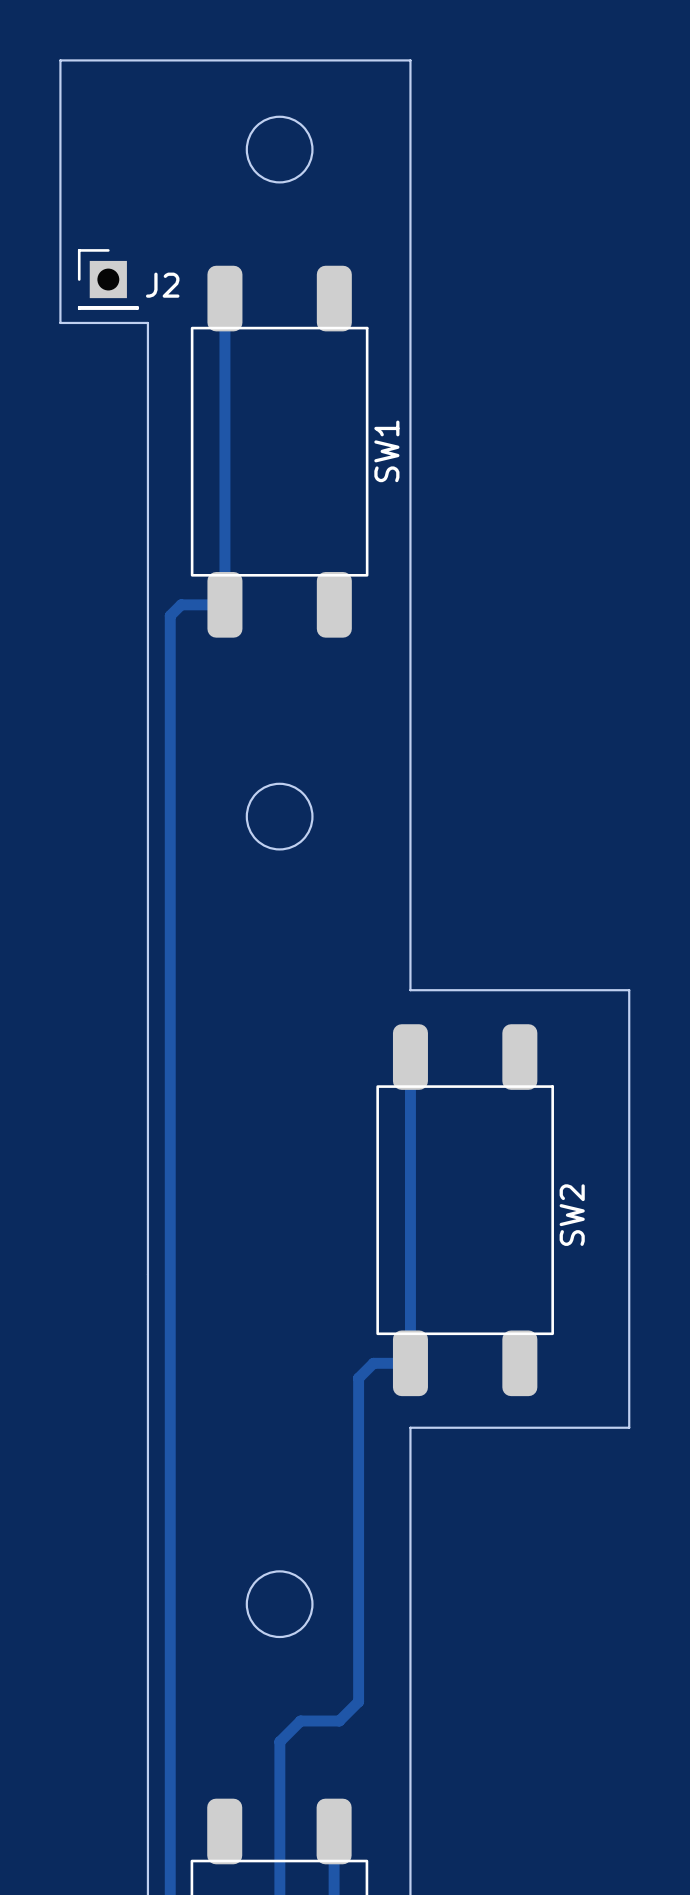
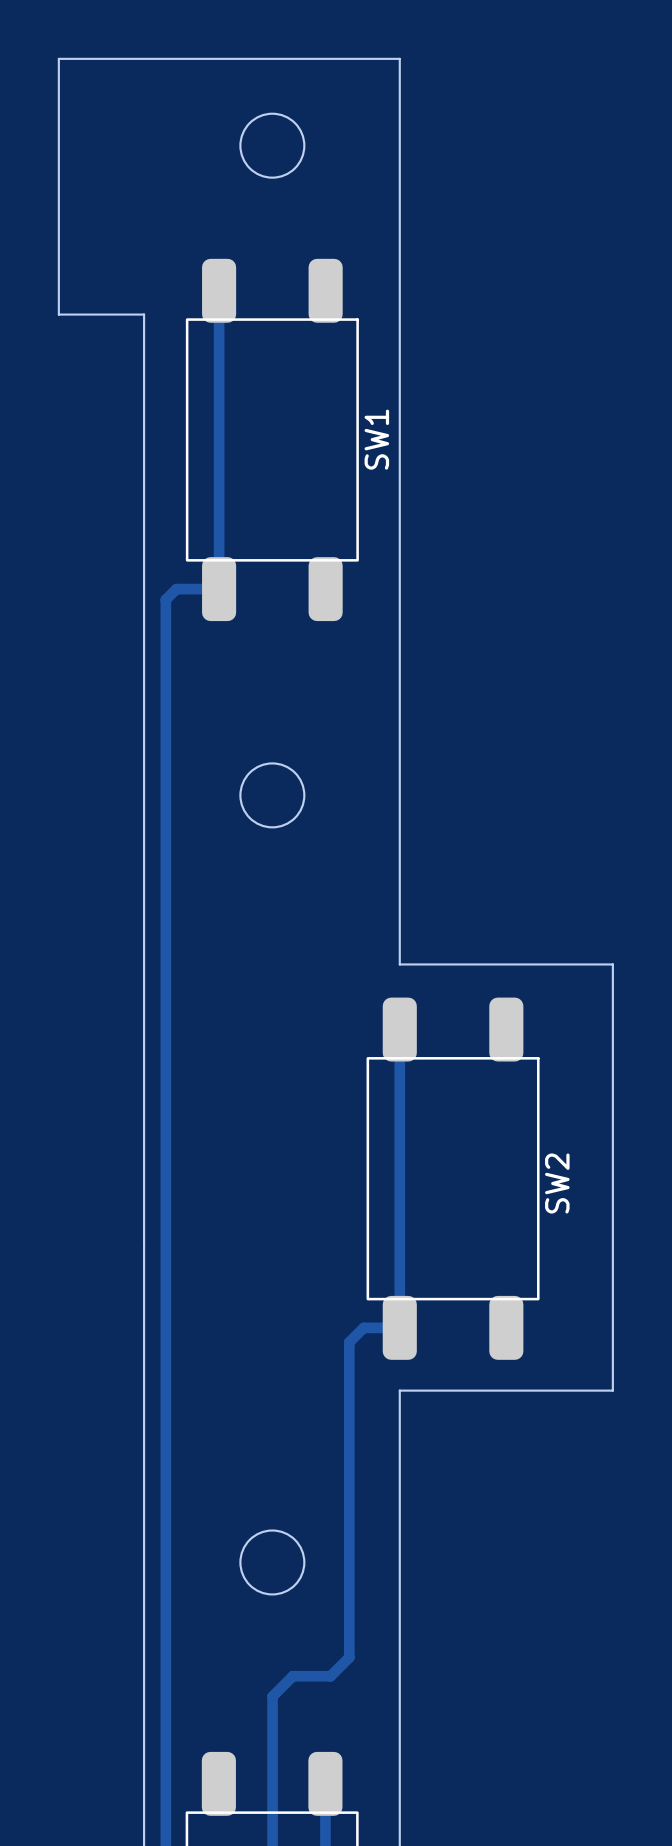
J2: (108, 279) -> none

